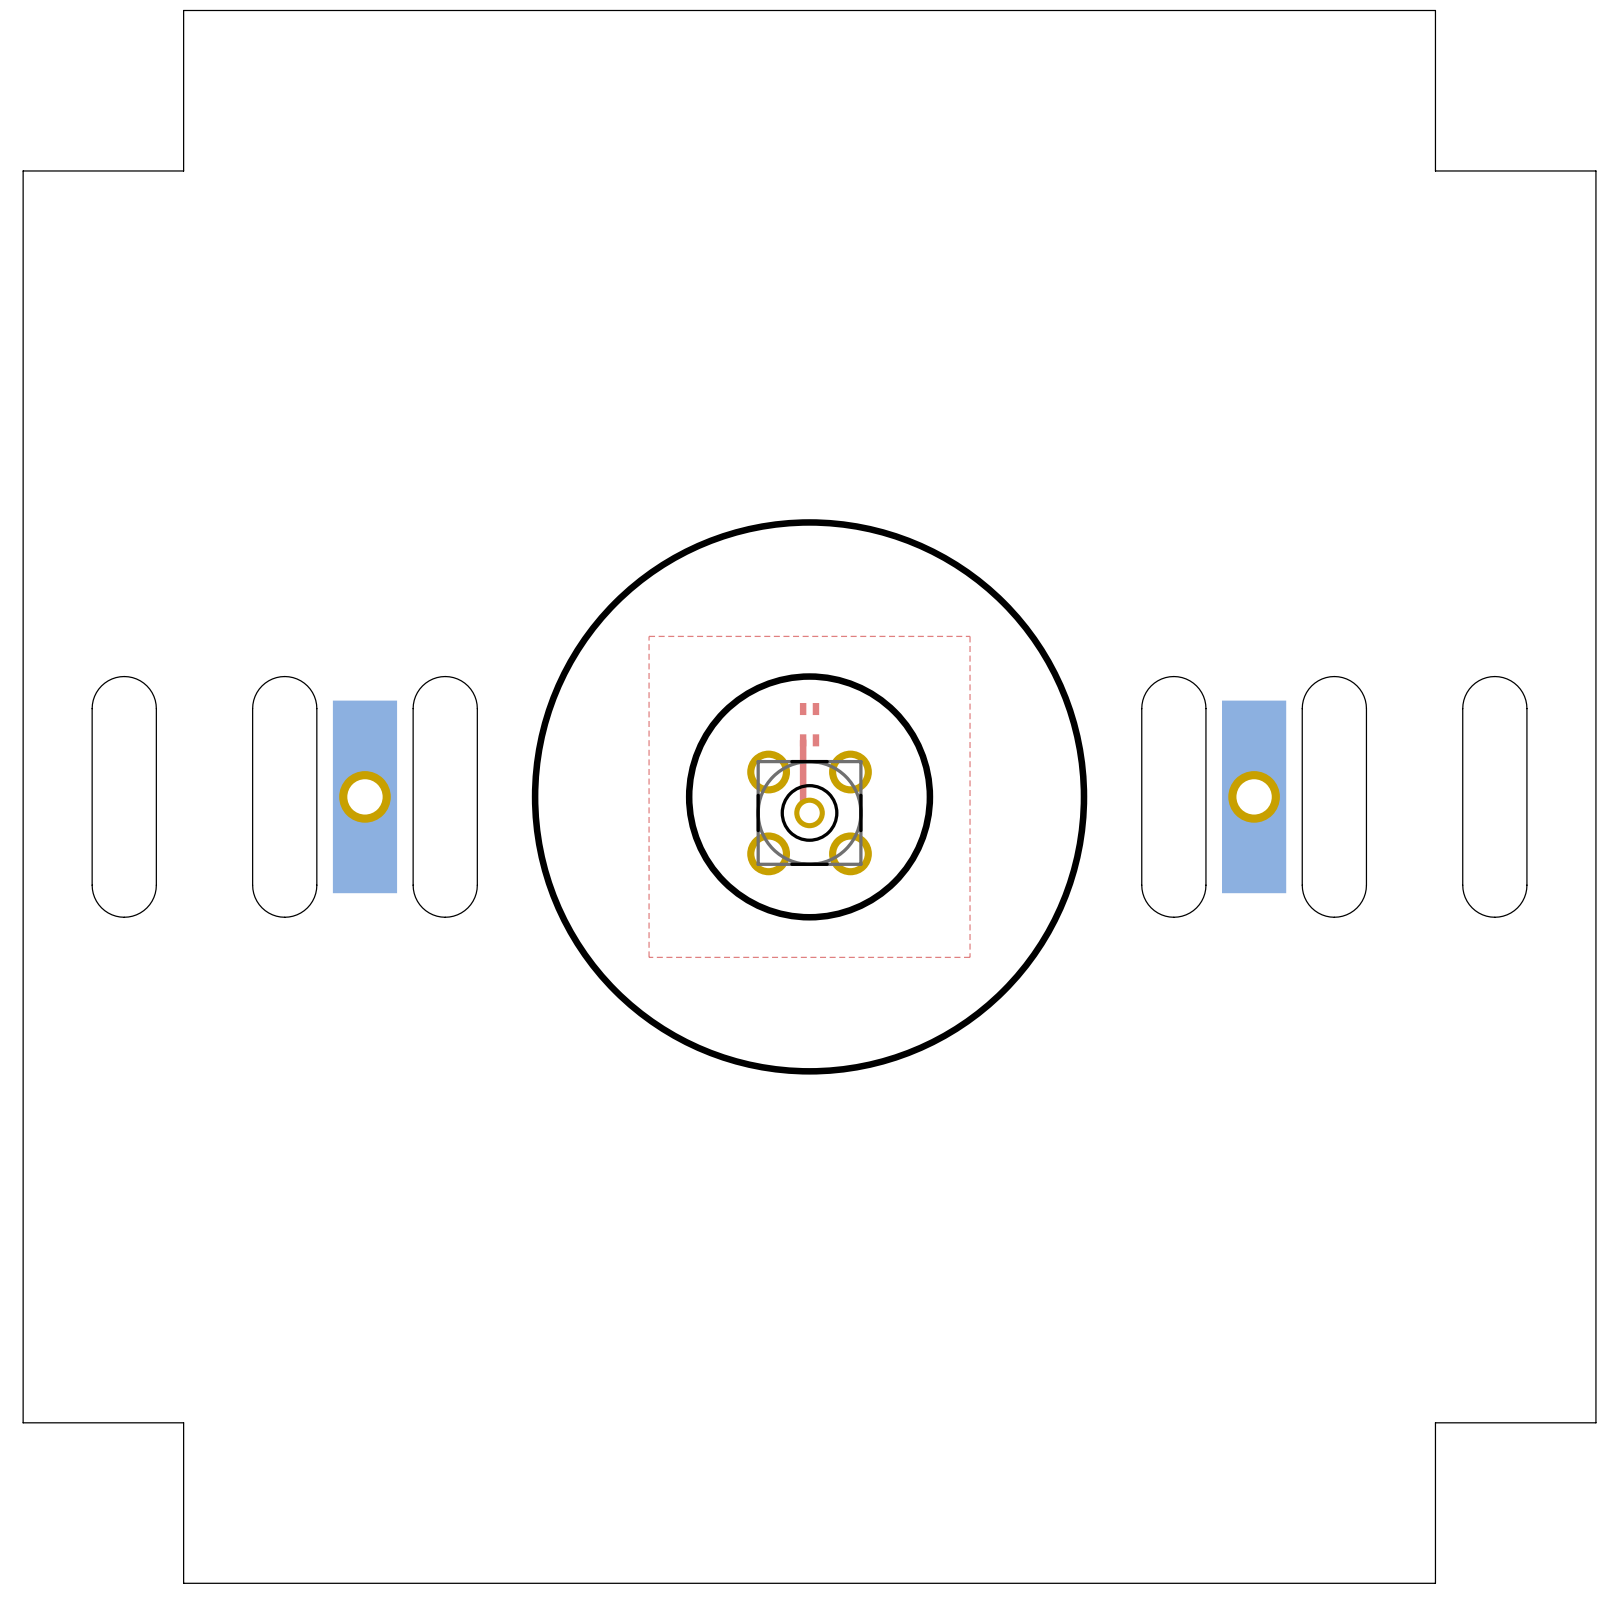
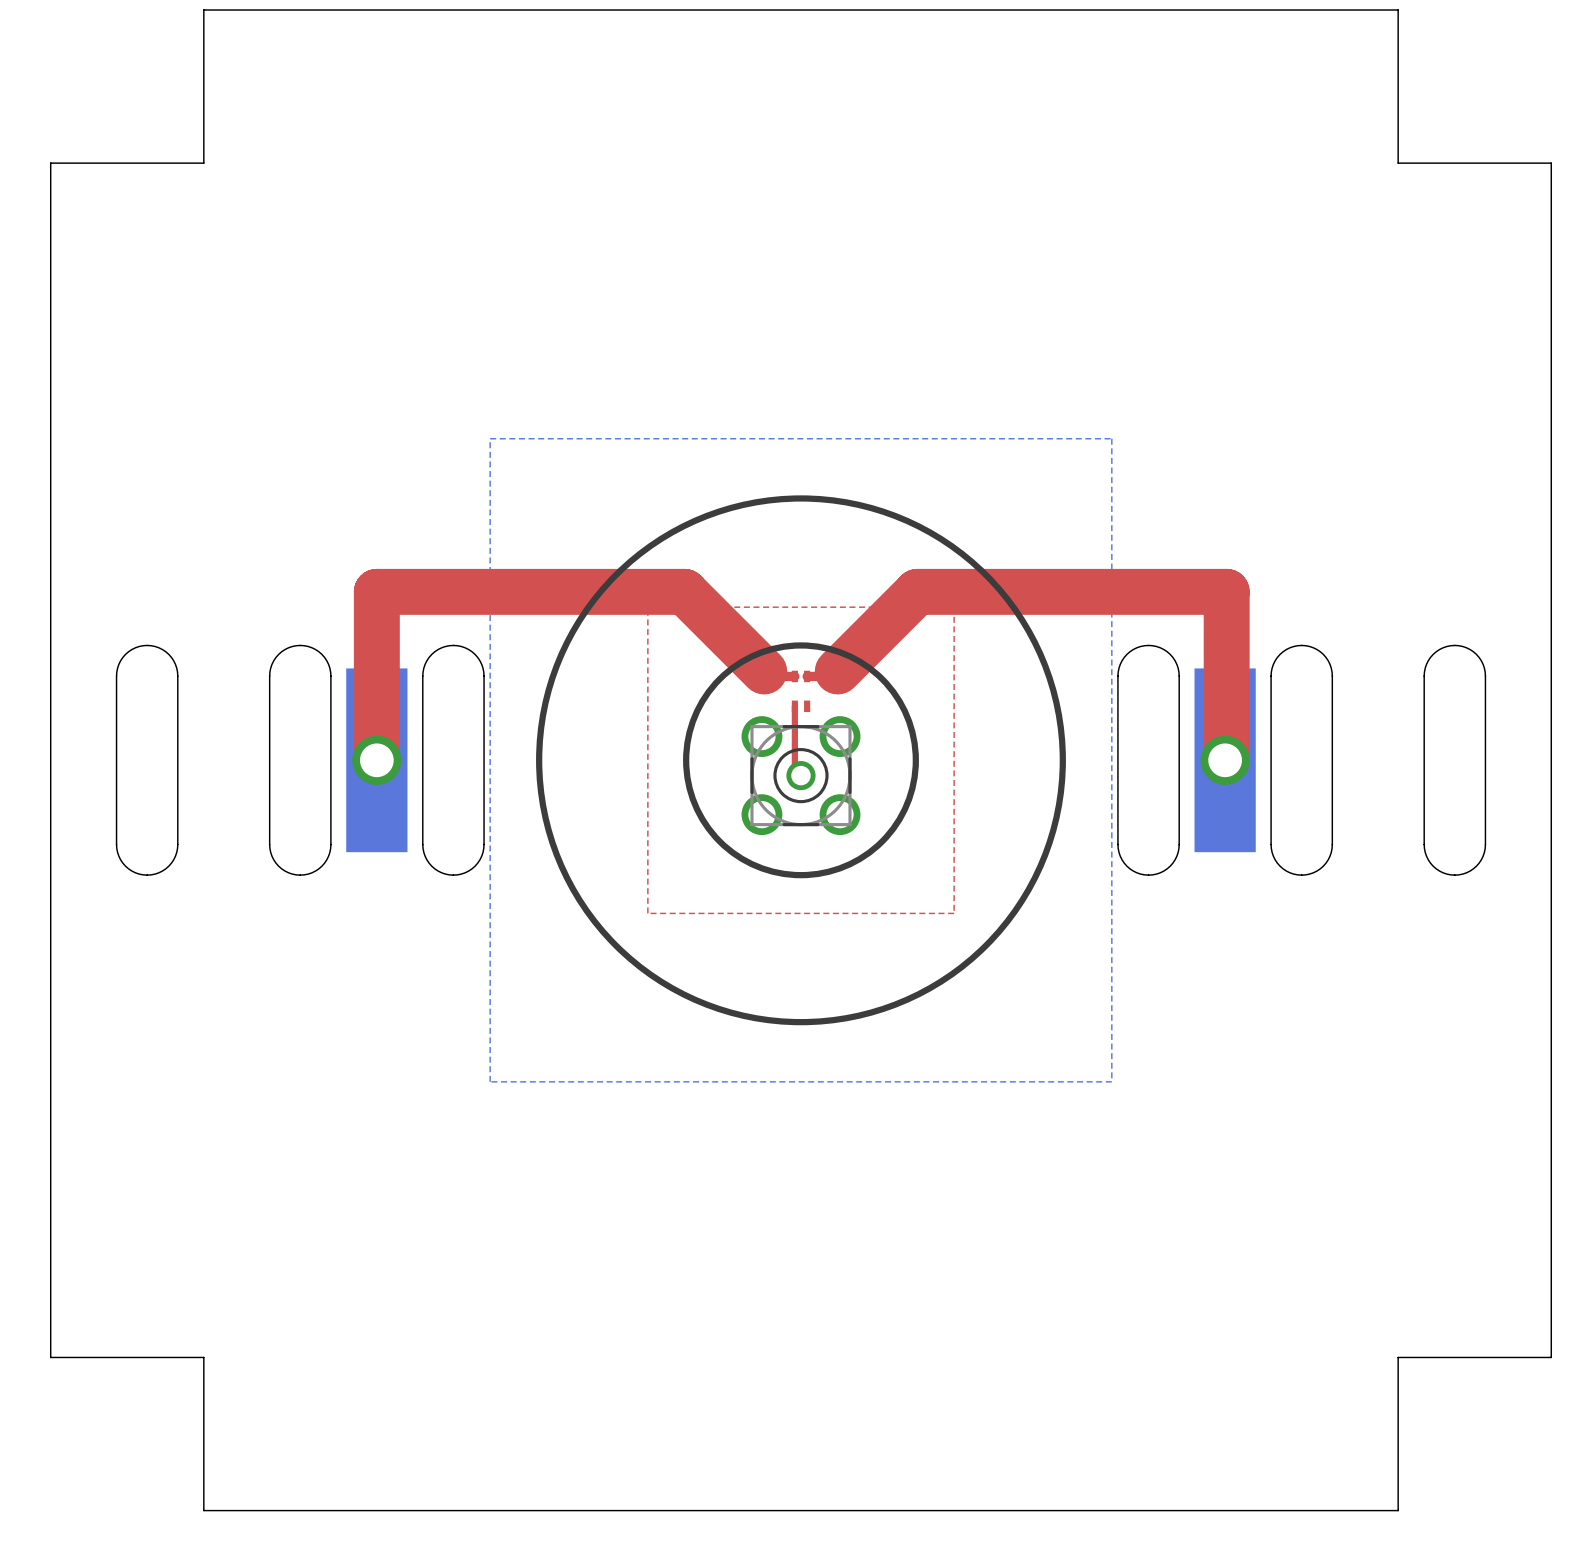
bottom zone outline: none -> (490, 438) (1111, 438) (1111, 1081) (490, 1081) (490, 438)
top track: none -> (794, 676) (769, 676) (684, 591) (376, 591) (376, 760)
top track: none -> (807, 676) (832, 676) (917, 591) (1226, 591) (1226, 760) (1225, 760)

